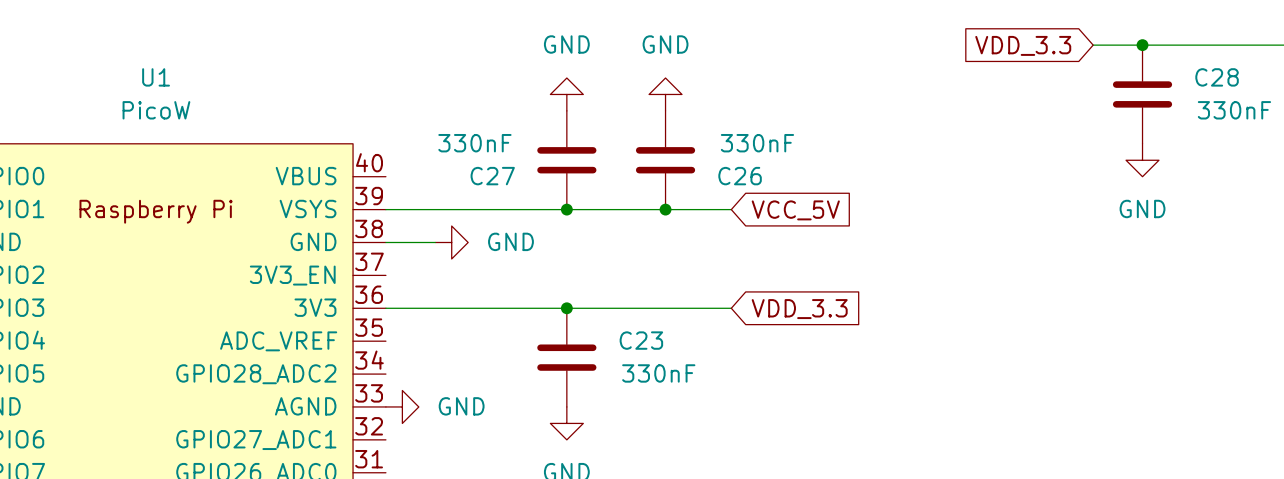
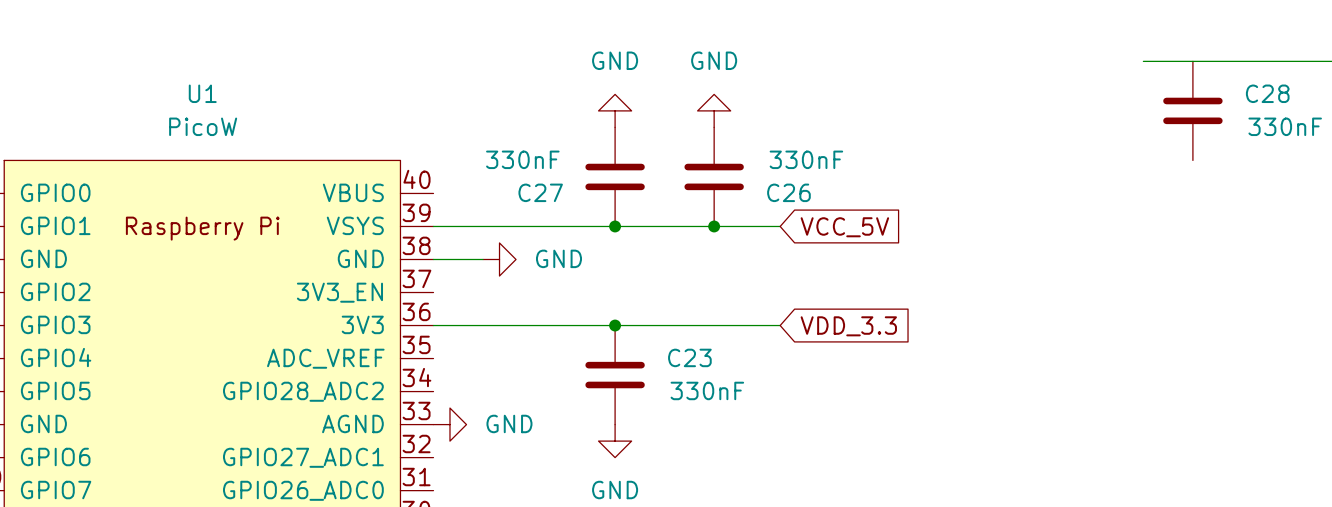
global label: VDD_3.3 (1023, 45) -> none
junction: (1142, 45) -> none
power symbol: GND (1142, 160) -> none

